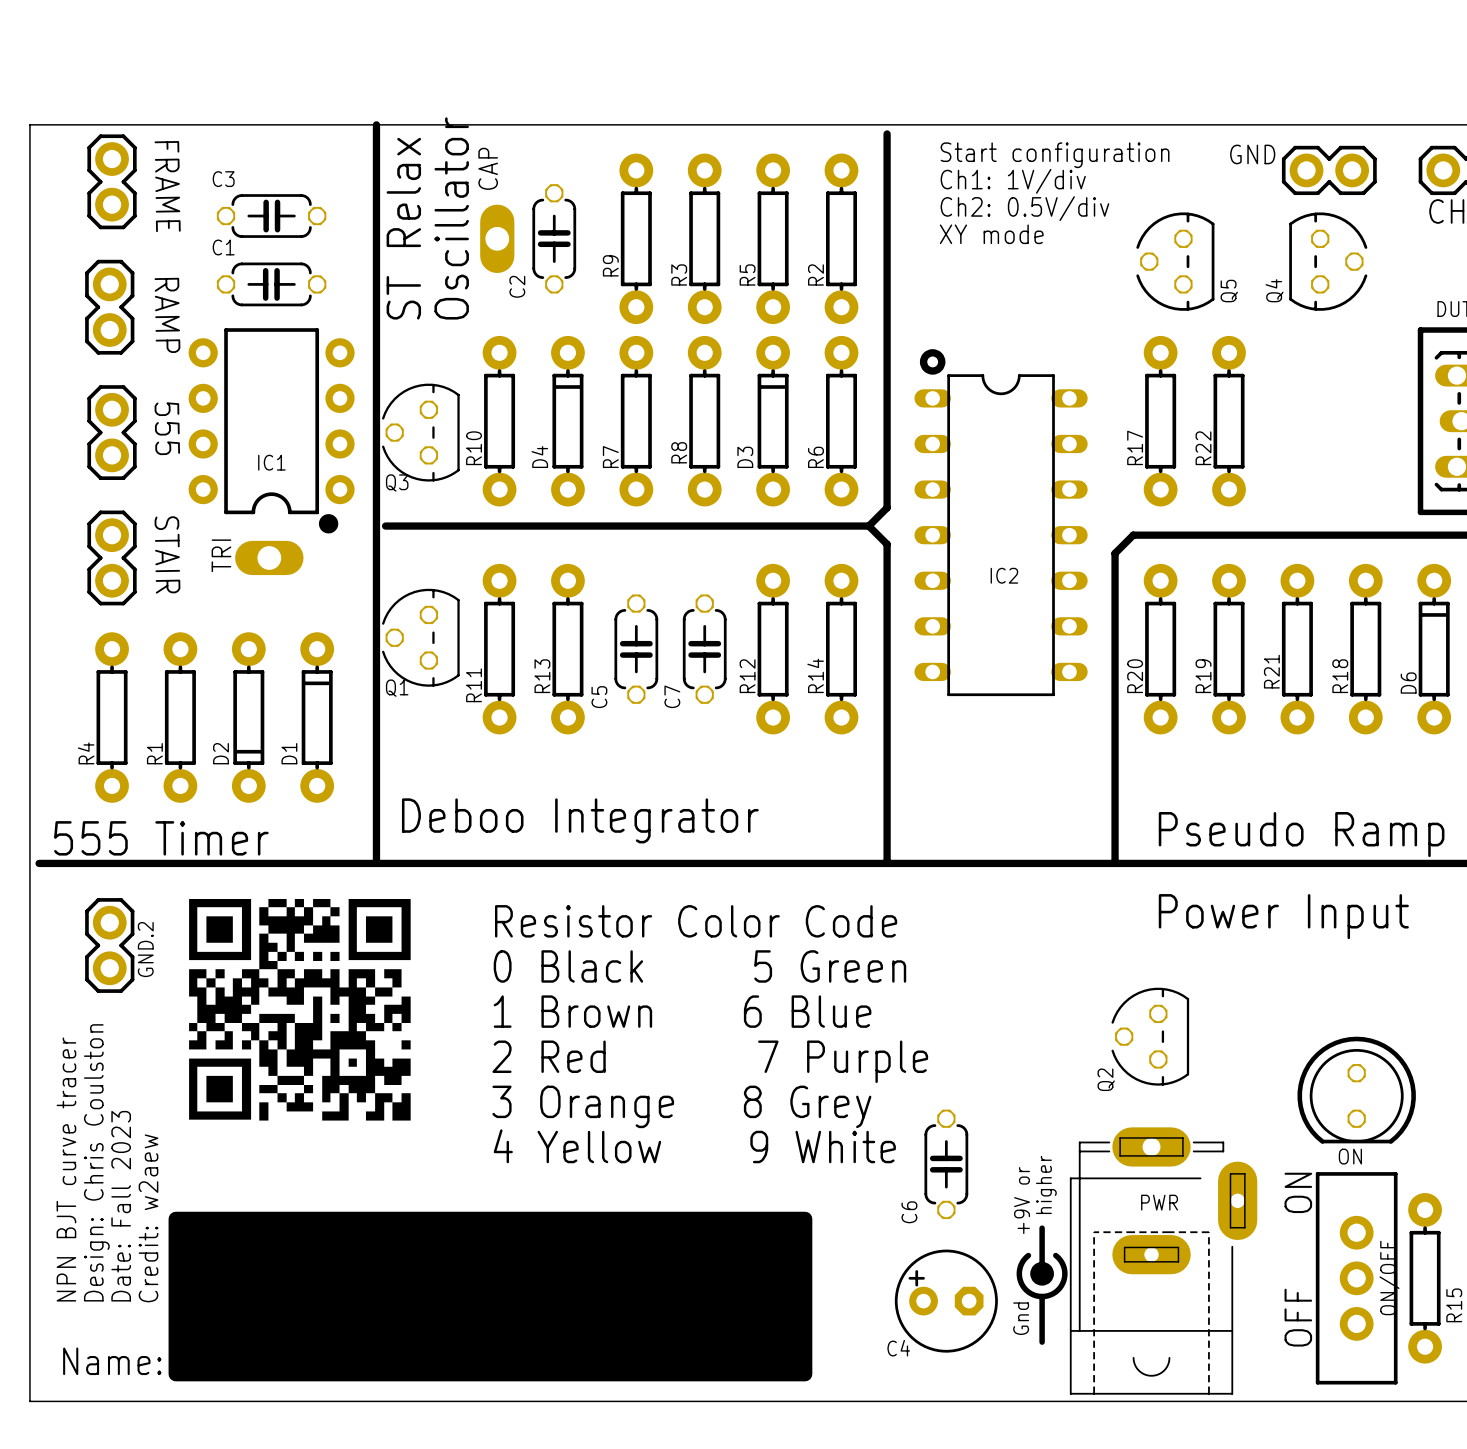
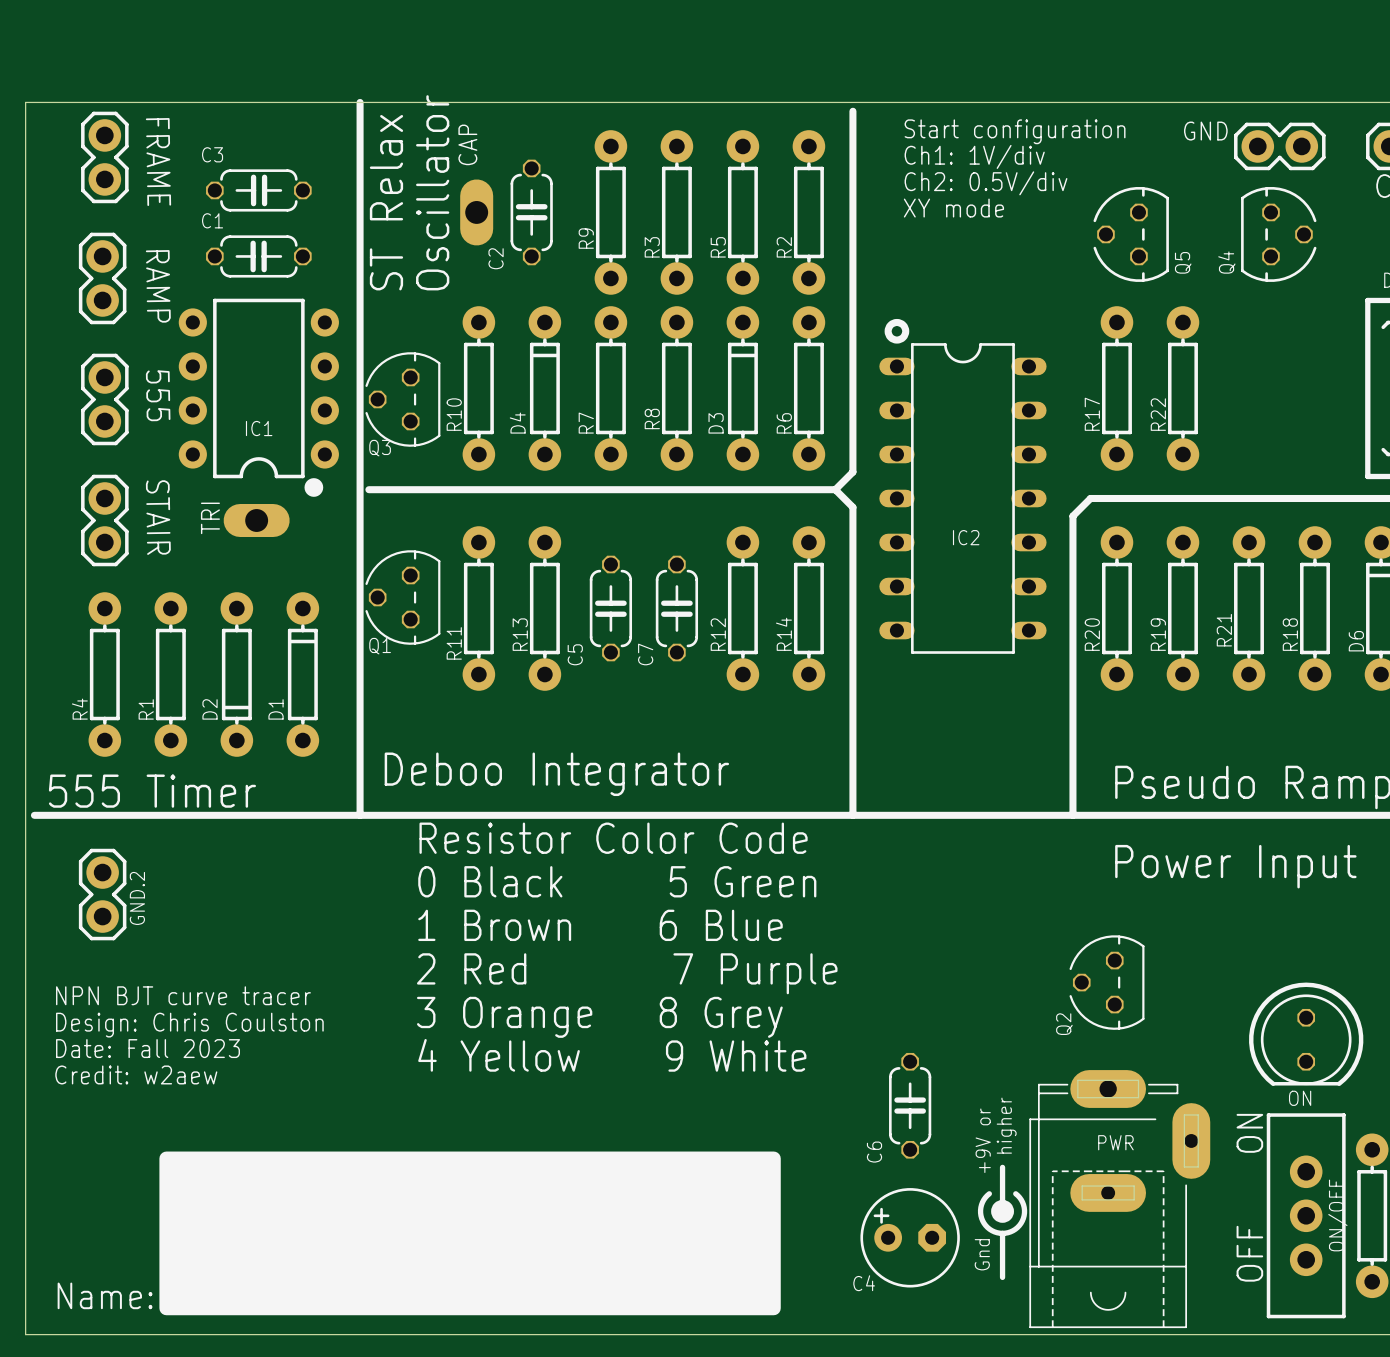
drawing: [189, 898, 411, 1121] -> none
text position: Resistor Color Code (696, 921) -> Resistor Color Code (613, 838)
text position: 0 Black 5 Green (699, 966) -> 0 Black 5 Green (617, 881)
text position: 1 Brown 6 Blue (682, 1011) -> 1 Brown 6 Blue (600, 925)
text position: 2 Red 7 Purple (710, 1061) -> 2 Red 7 Purple (627, 973)
text position: 3 Orange 8 Grey (681, 1106) -> 3 Orange 8 Grey (599, 1017)
text position: 4 Yellow 9 White (694, 1146) -> 4 Yellow 9 White (612, 1055)
text rotation: 0° (96, 1162) -> 90° clockwise (189, 1025)
text rotation: 0° (66, 1169) -> 90° clockwise (183, 995)
text rotation: 0° (121, 1206) -> 90° clockwise (148, 1048)
text rotation: 0° (148, 1218) -> 90° clockwise (136, 1074)

